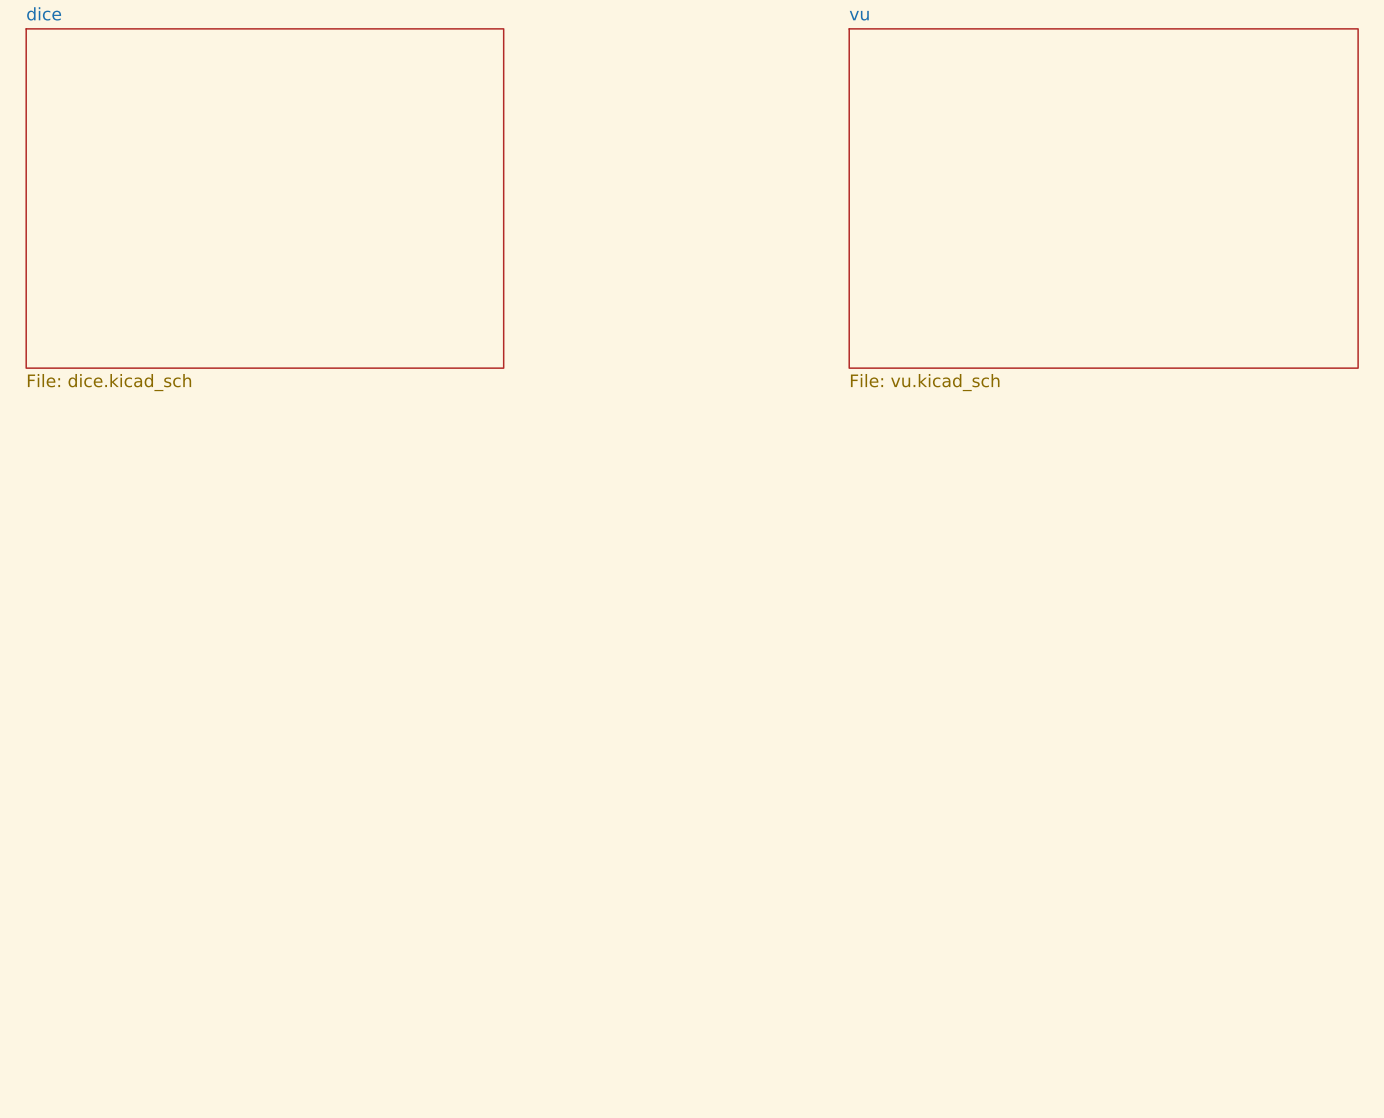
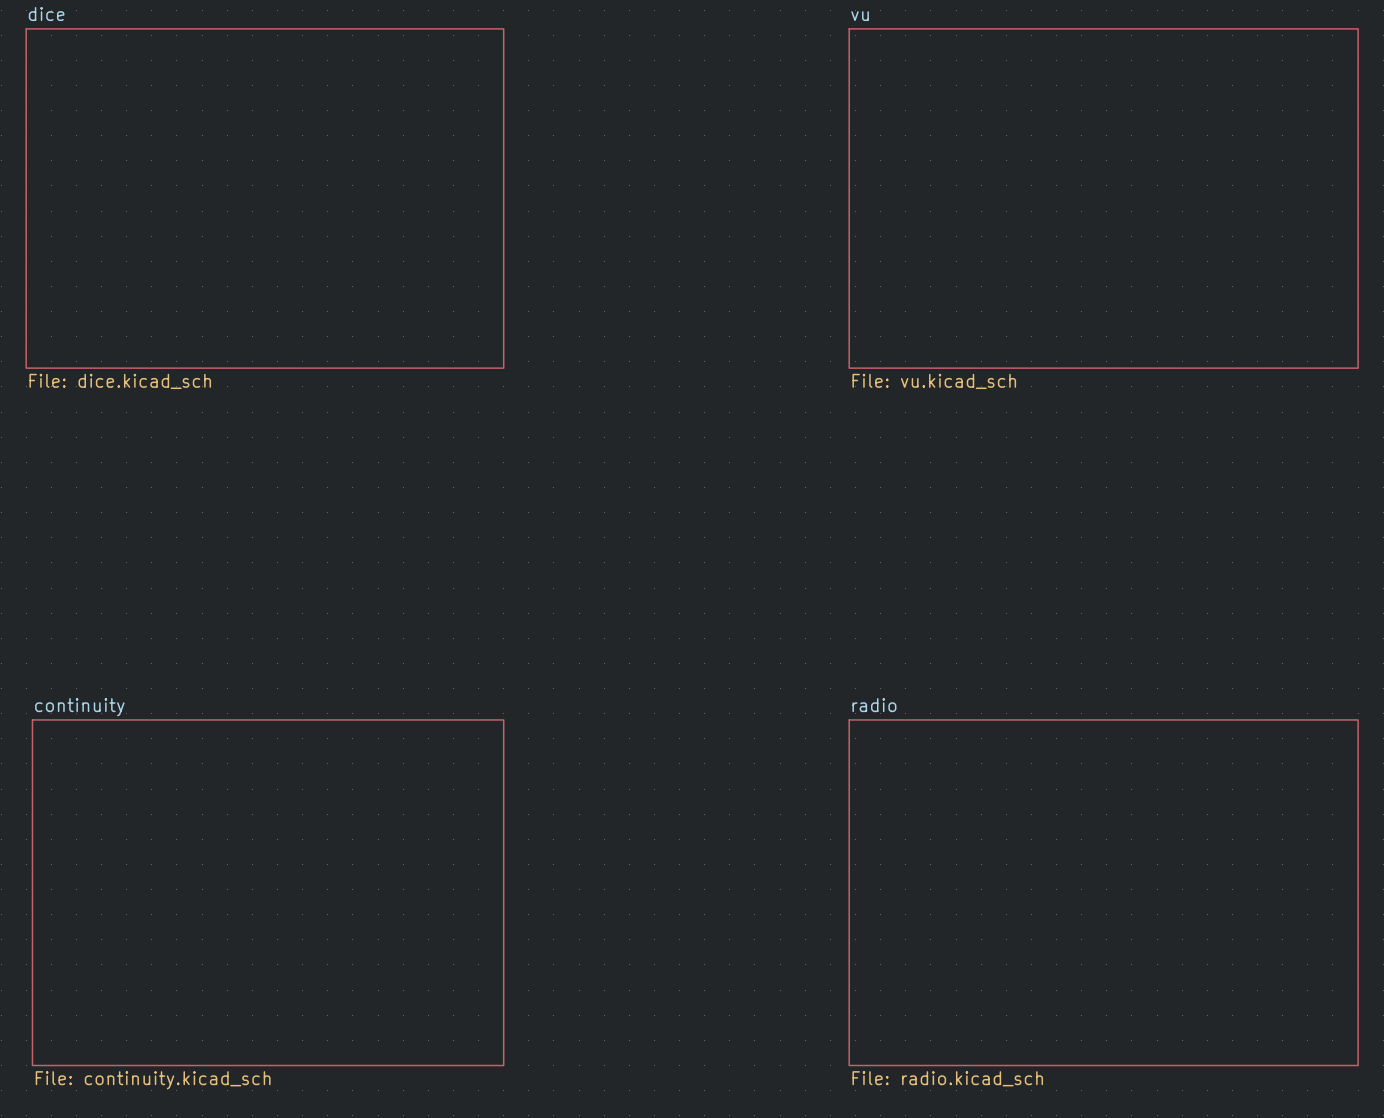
sheet continuity: none -> File: continuity.kicad_sch (268, 892)
sheet radio: none -> File: radio.kicad_sch (1103, 892)

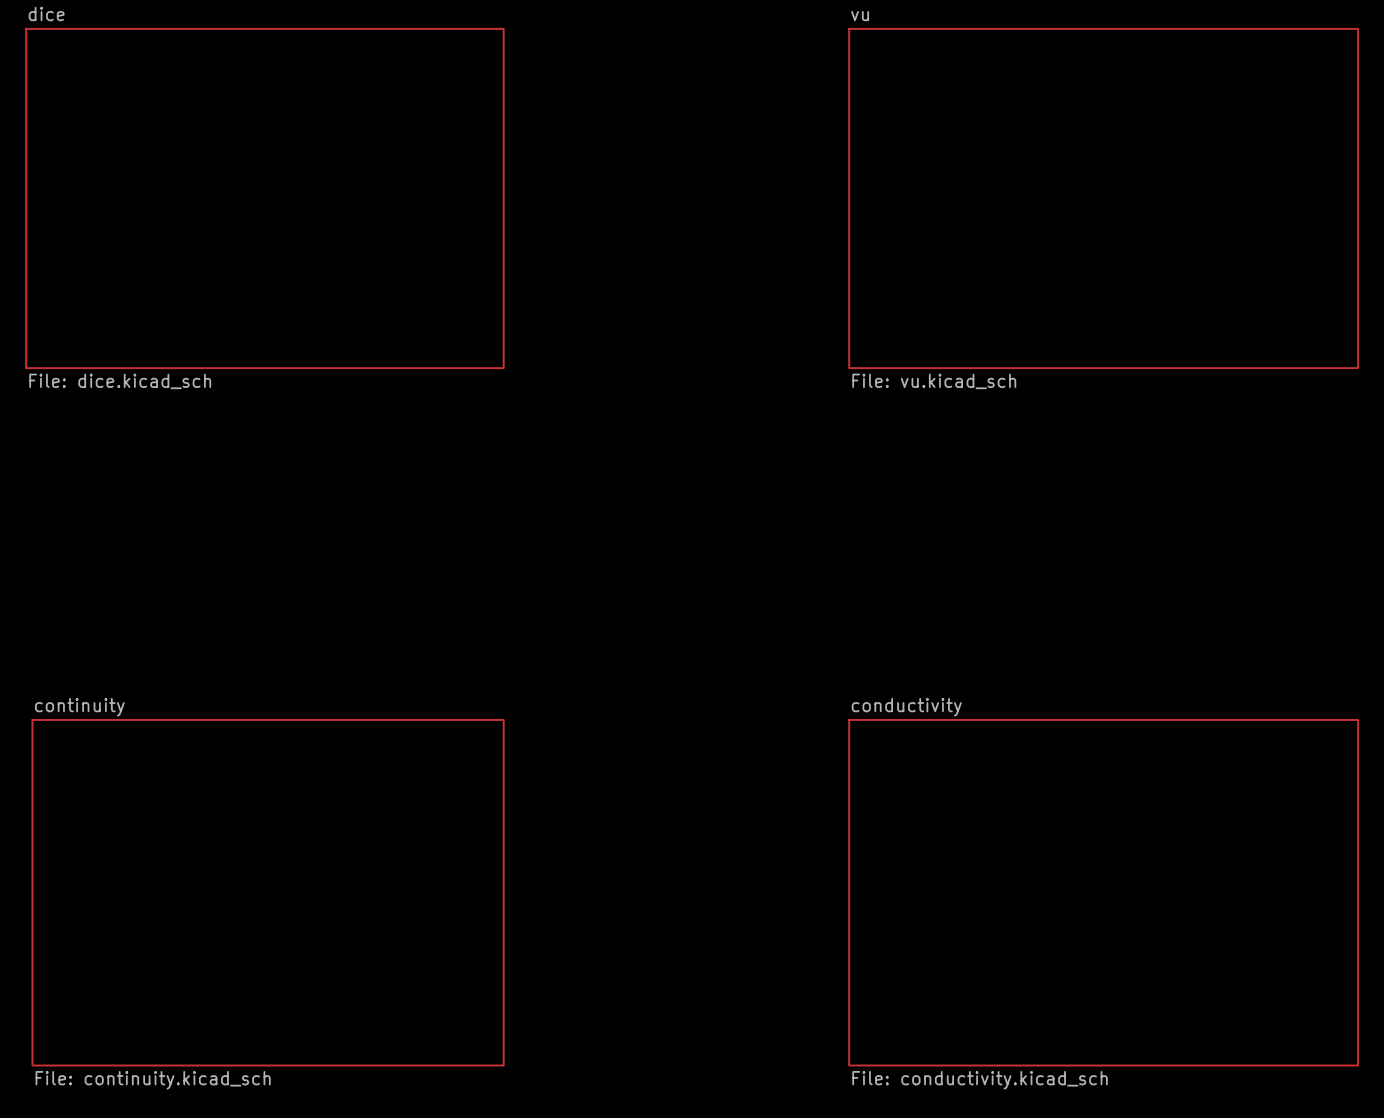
sheet radio name: radio (874, 705) -> conductivity (906, 707)
sheet radio value: File: radio.kicad_sch (947, 1078) -> File: conductivity.kicad_sch (980, 1080)

